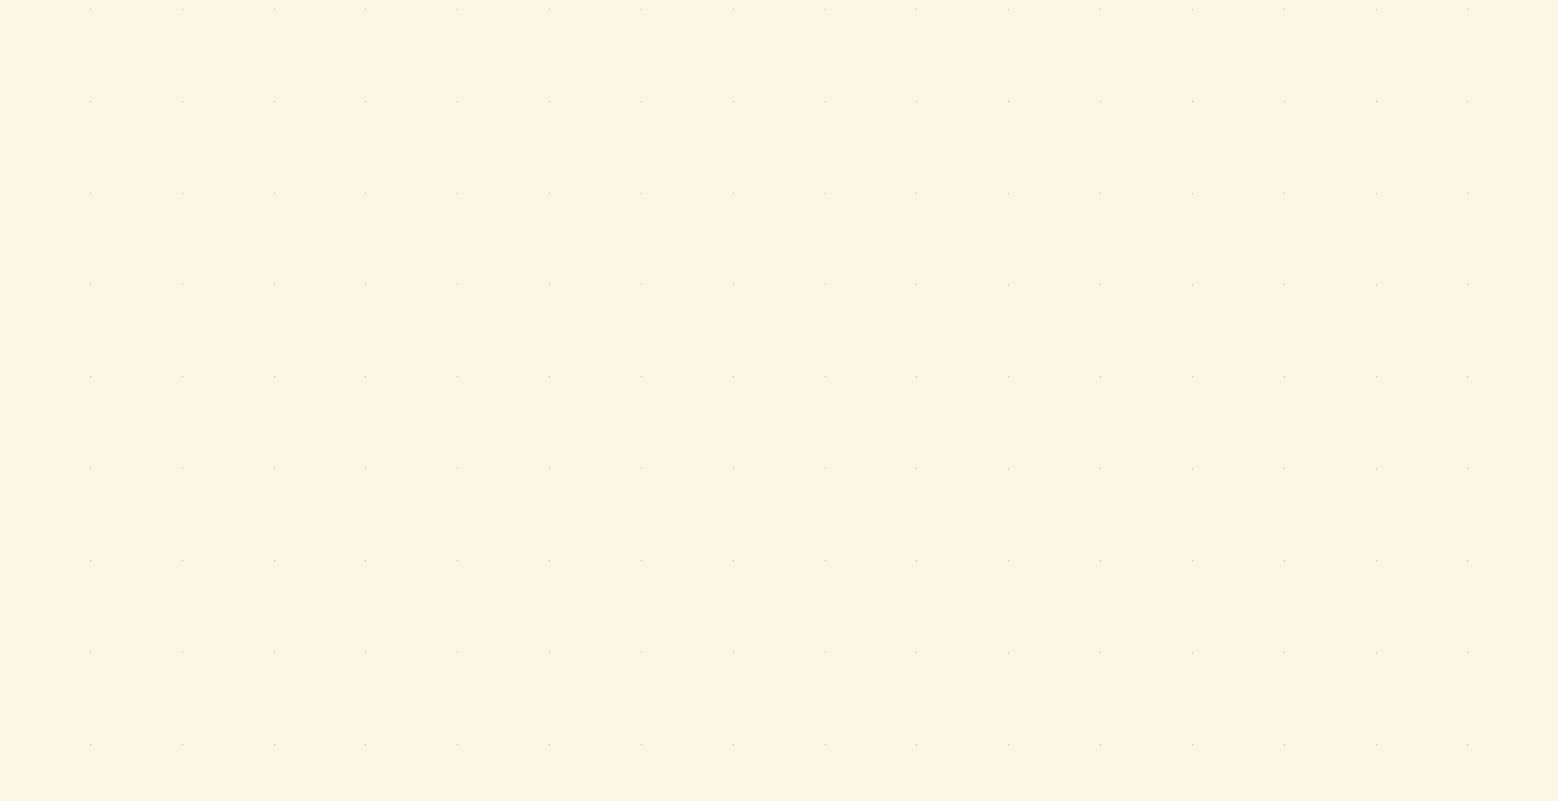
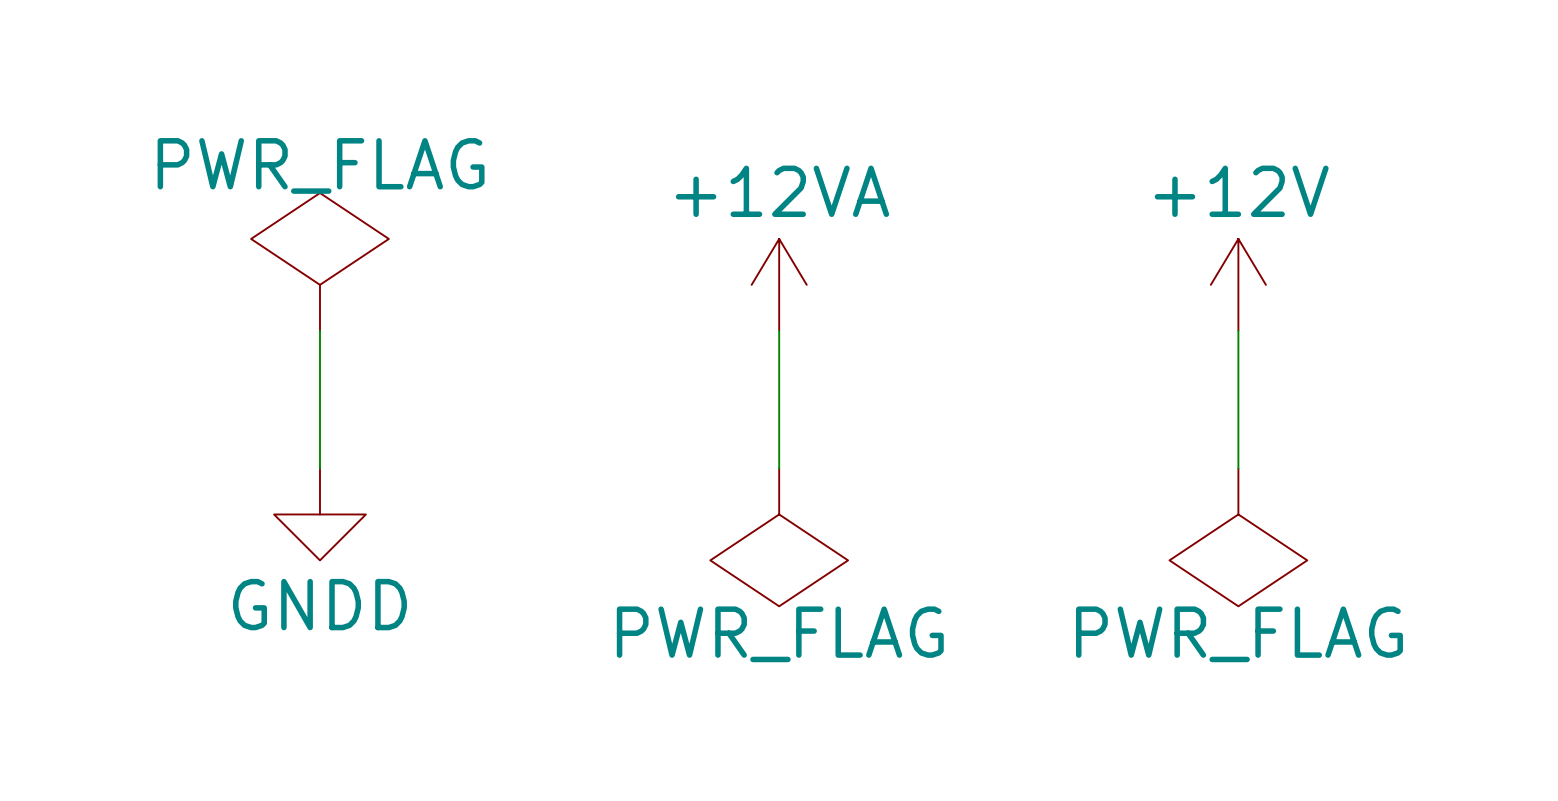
power symbol: none -> PWR_FLAG (319, 261)
power symbol: none -> +12VA (779, 284)
power symbol: none -> +12V (1238, 284)
wire: none -> (319, 330) (319, 468)
wire: none -> (779, 330) (779, 468)
wire: none -> (1238, 330) (1238, 468)
power symbol: none -> GNDD (319, 514)
power symbol: none -> PWR_FLAG (779, 537)
power symbol: none -> PWR_FLAG (1238, 537)

